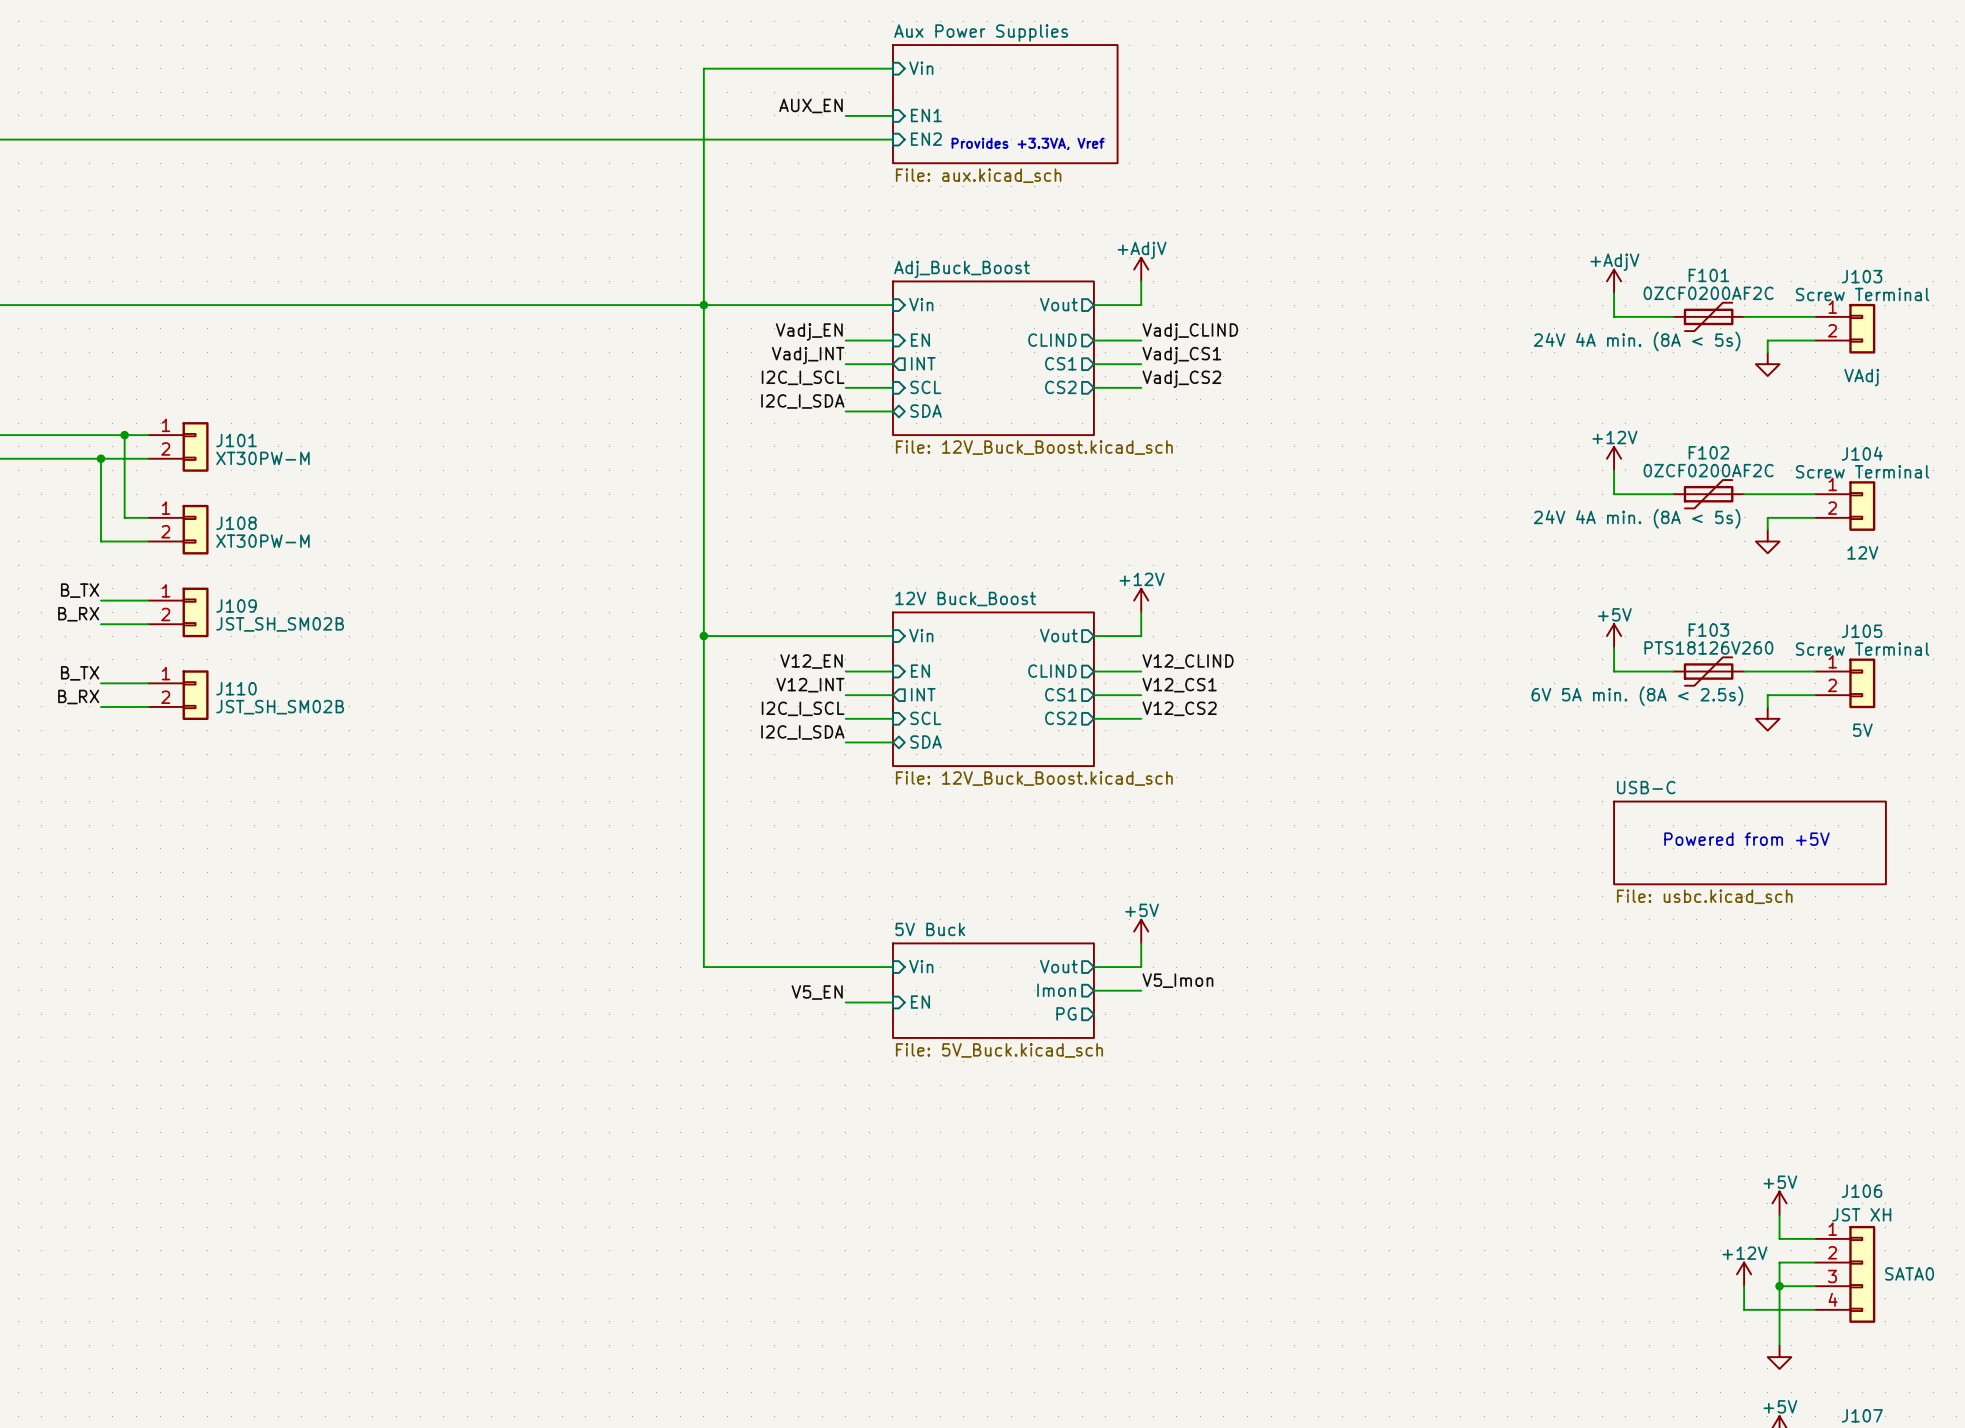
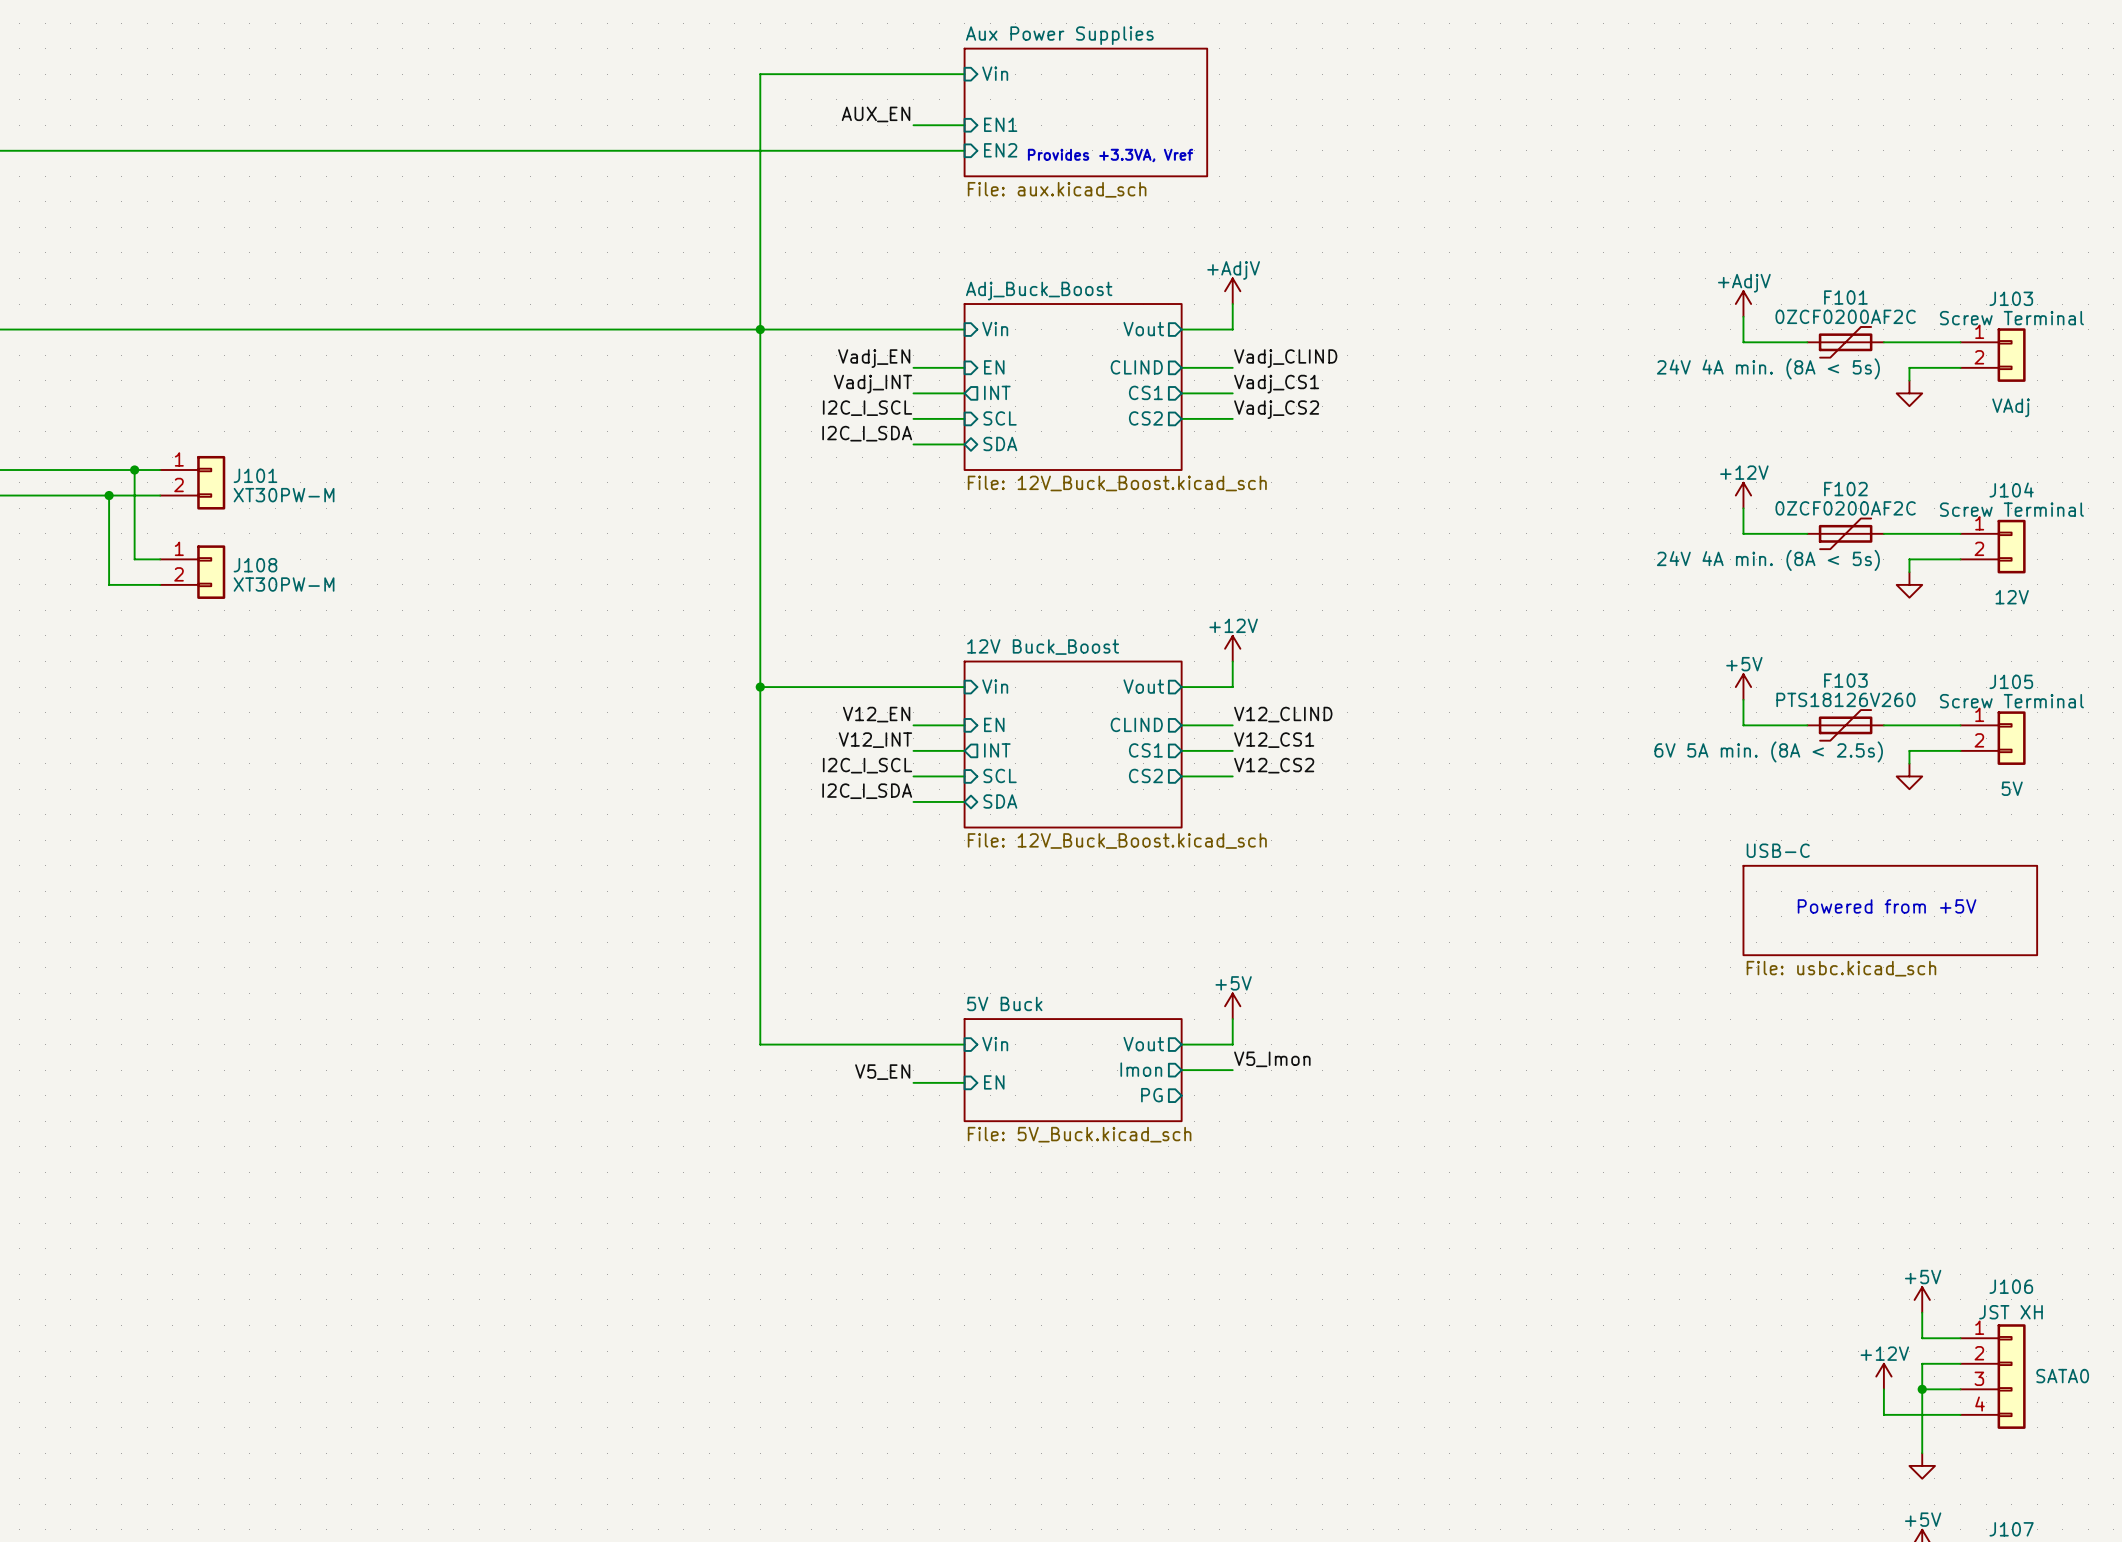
label: B_TX (80, 590) -> none
wire: (100, 600) (148, 600) -> none
J109: JST_SH_SM02B (178, 612) -> none
label: B_RX (78, 614) -> none
wire: (100, 624) (148, 624) -> none
label: B_TX (80, 673) -> none
wire: (100, 683) (148, 683) -> none
J110: JST_SH_SM02B (178, 695) -> none
label: B_RX (78, 697) -> none
wire: (100, 706) (148, 706) -> none

